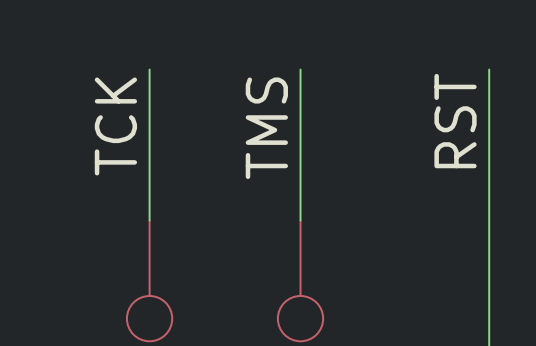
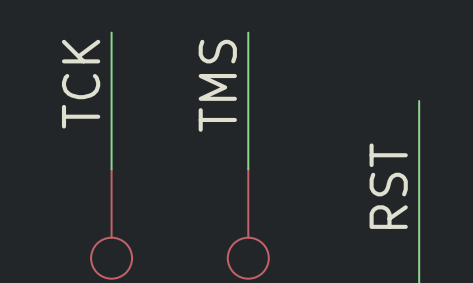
wire: (489, 69) (489, 145) -> none
label position: RST (455, 121) -> RST (388, 186)

